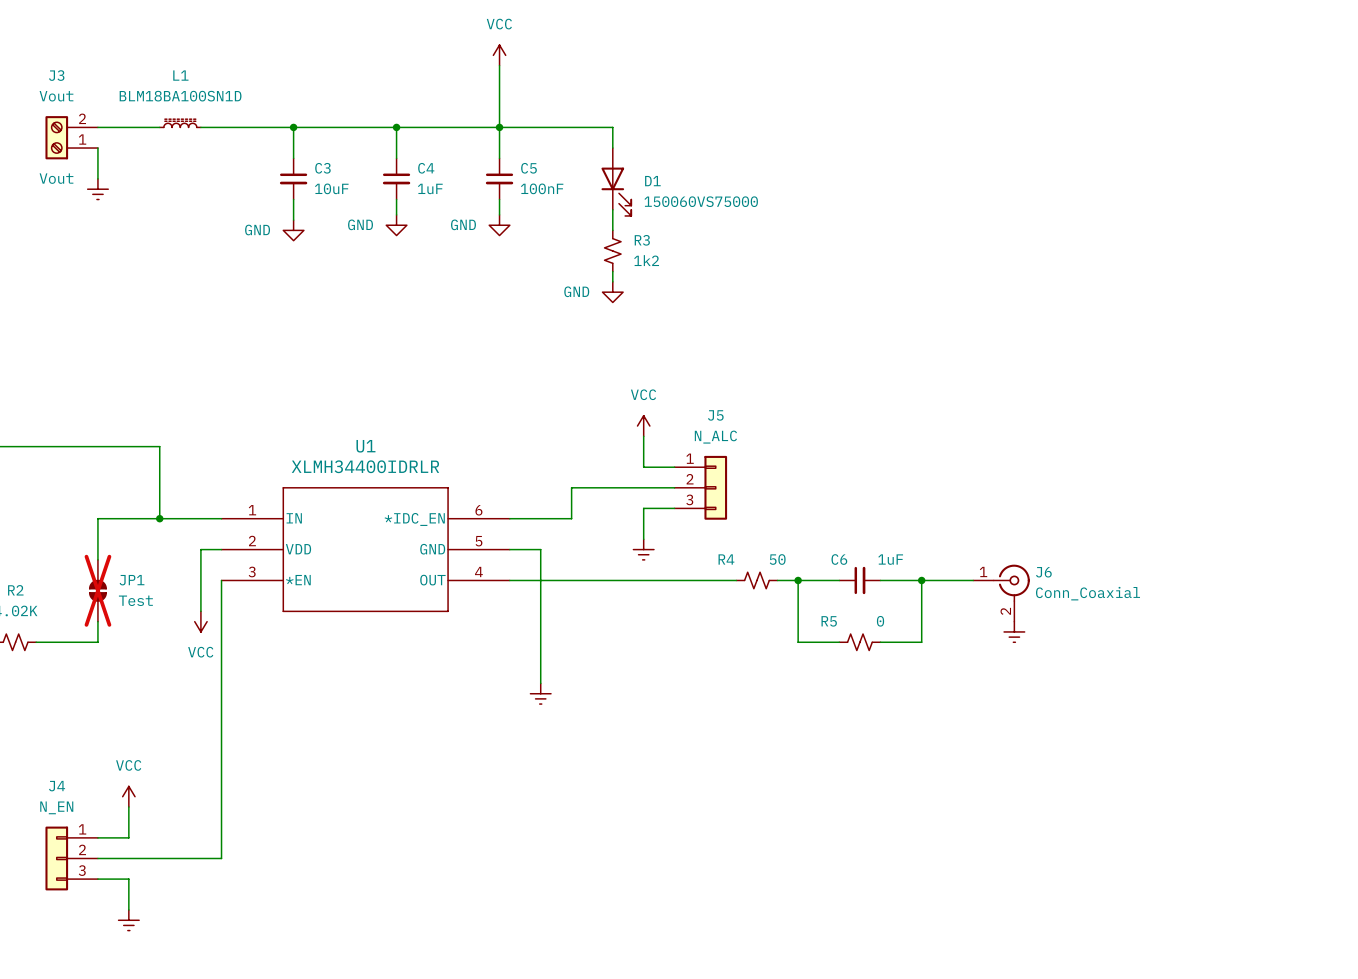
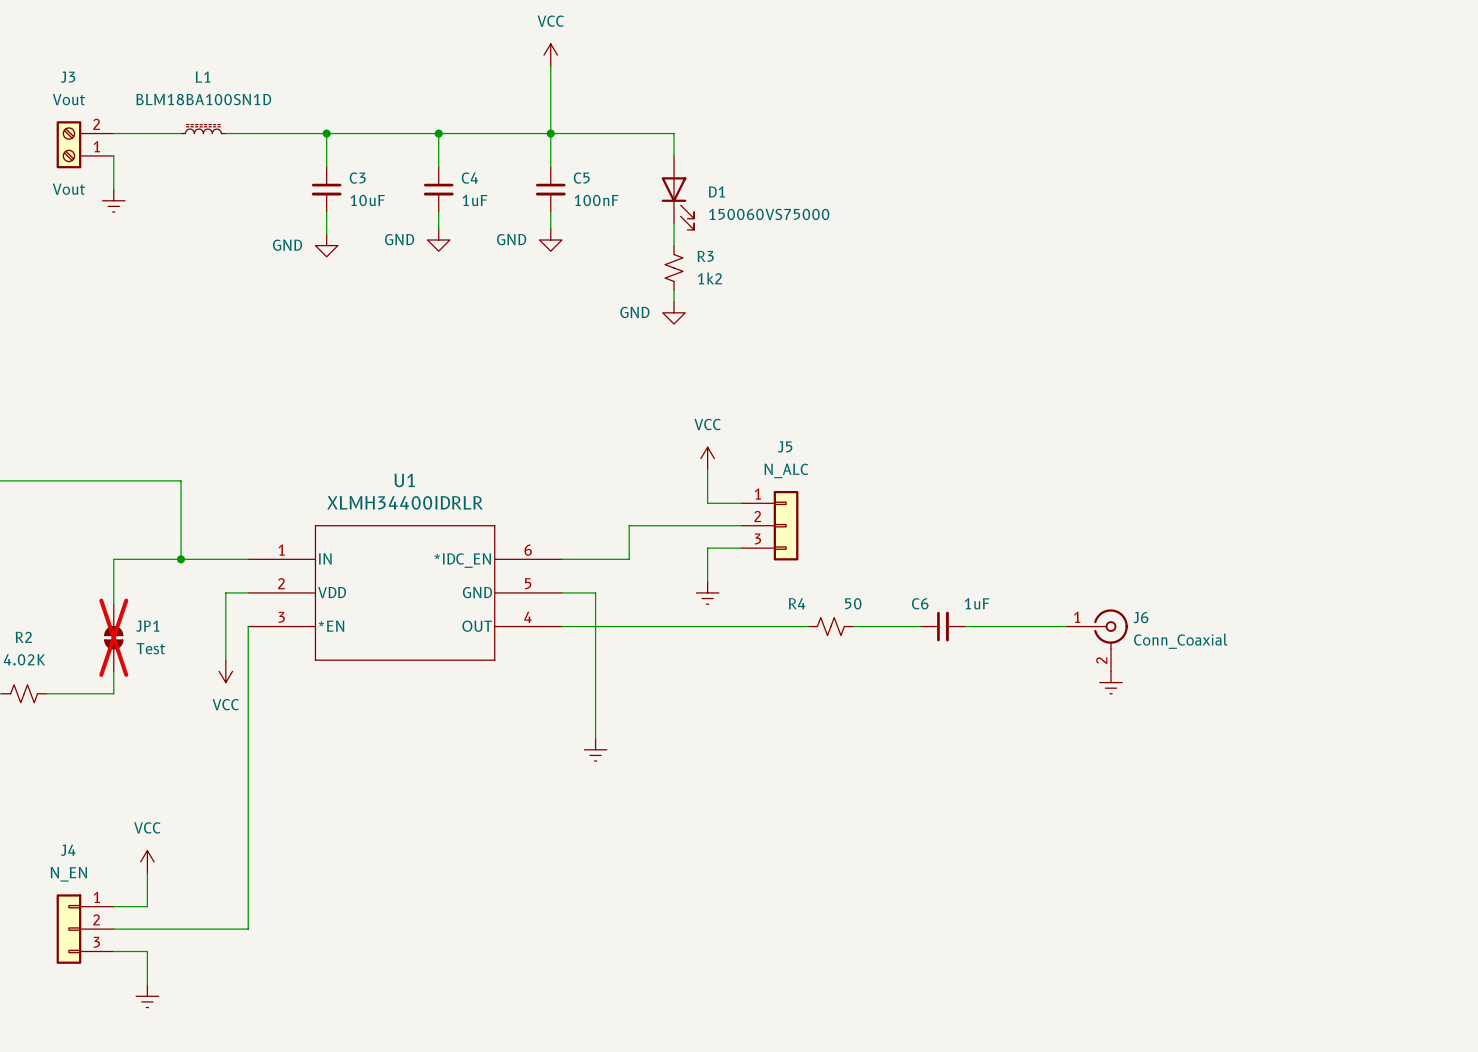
wire: (798, 580) (798, 642) (839, 642) -> none
junction: (798, 580) -> none
wire: (921, 580) (921, 642) (880, 642) -> none
junction: (921, 580) -> none
R5: 0 (859, 642) -> none

